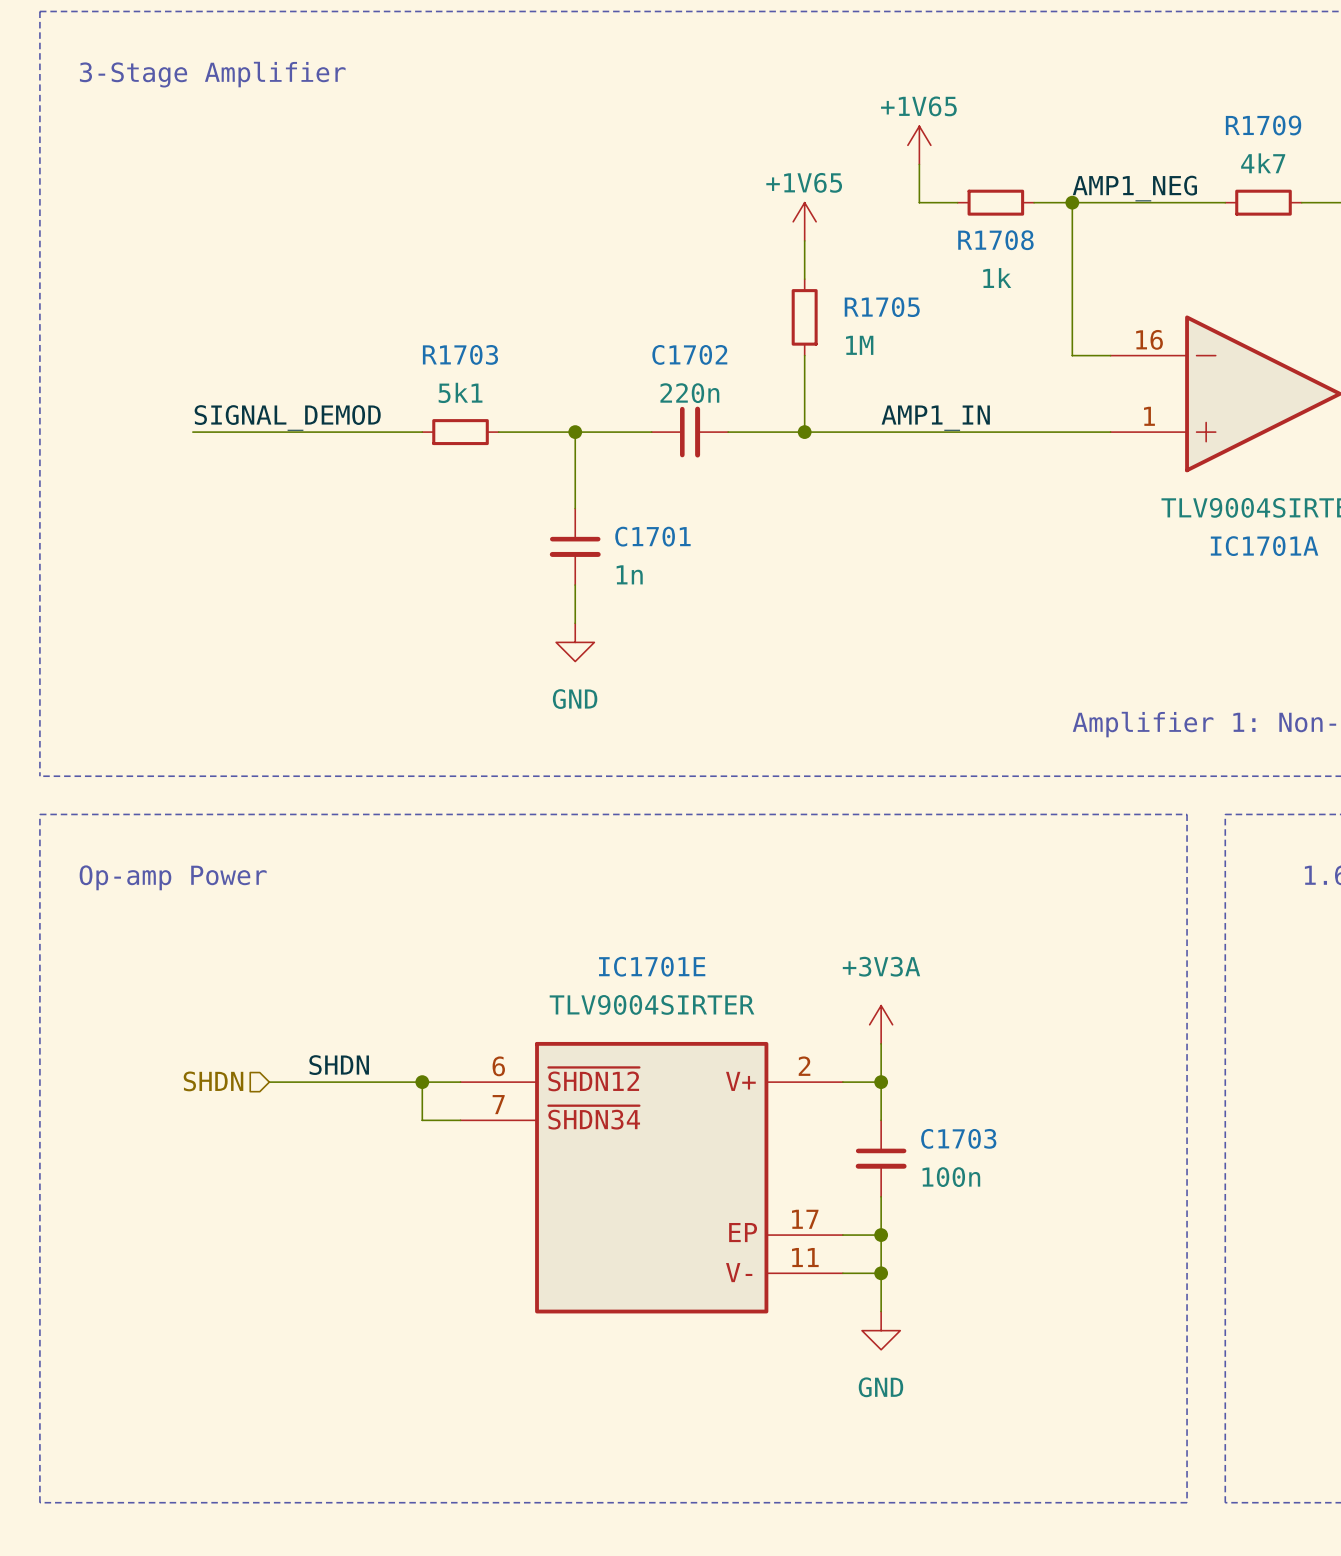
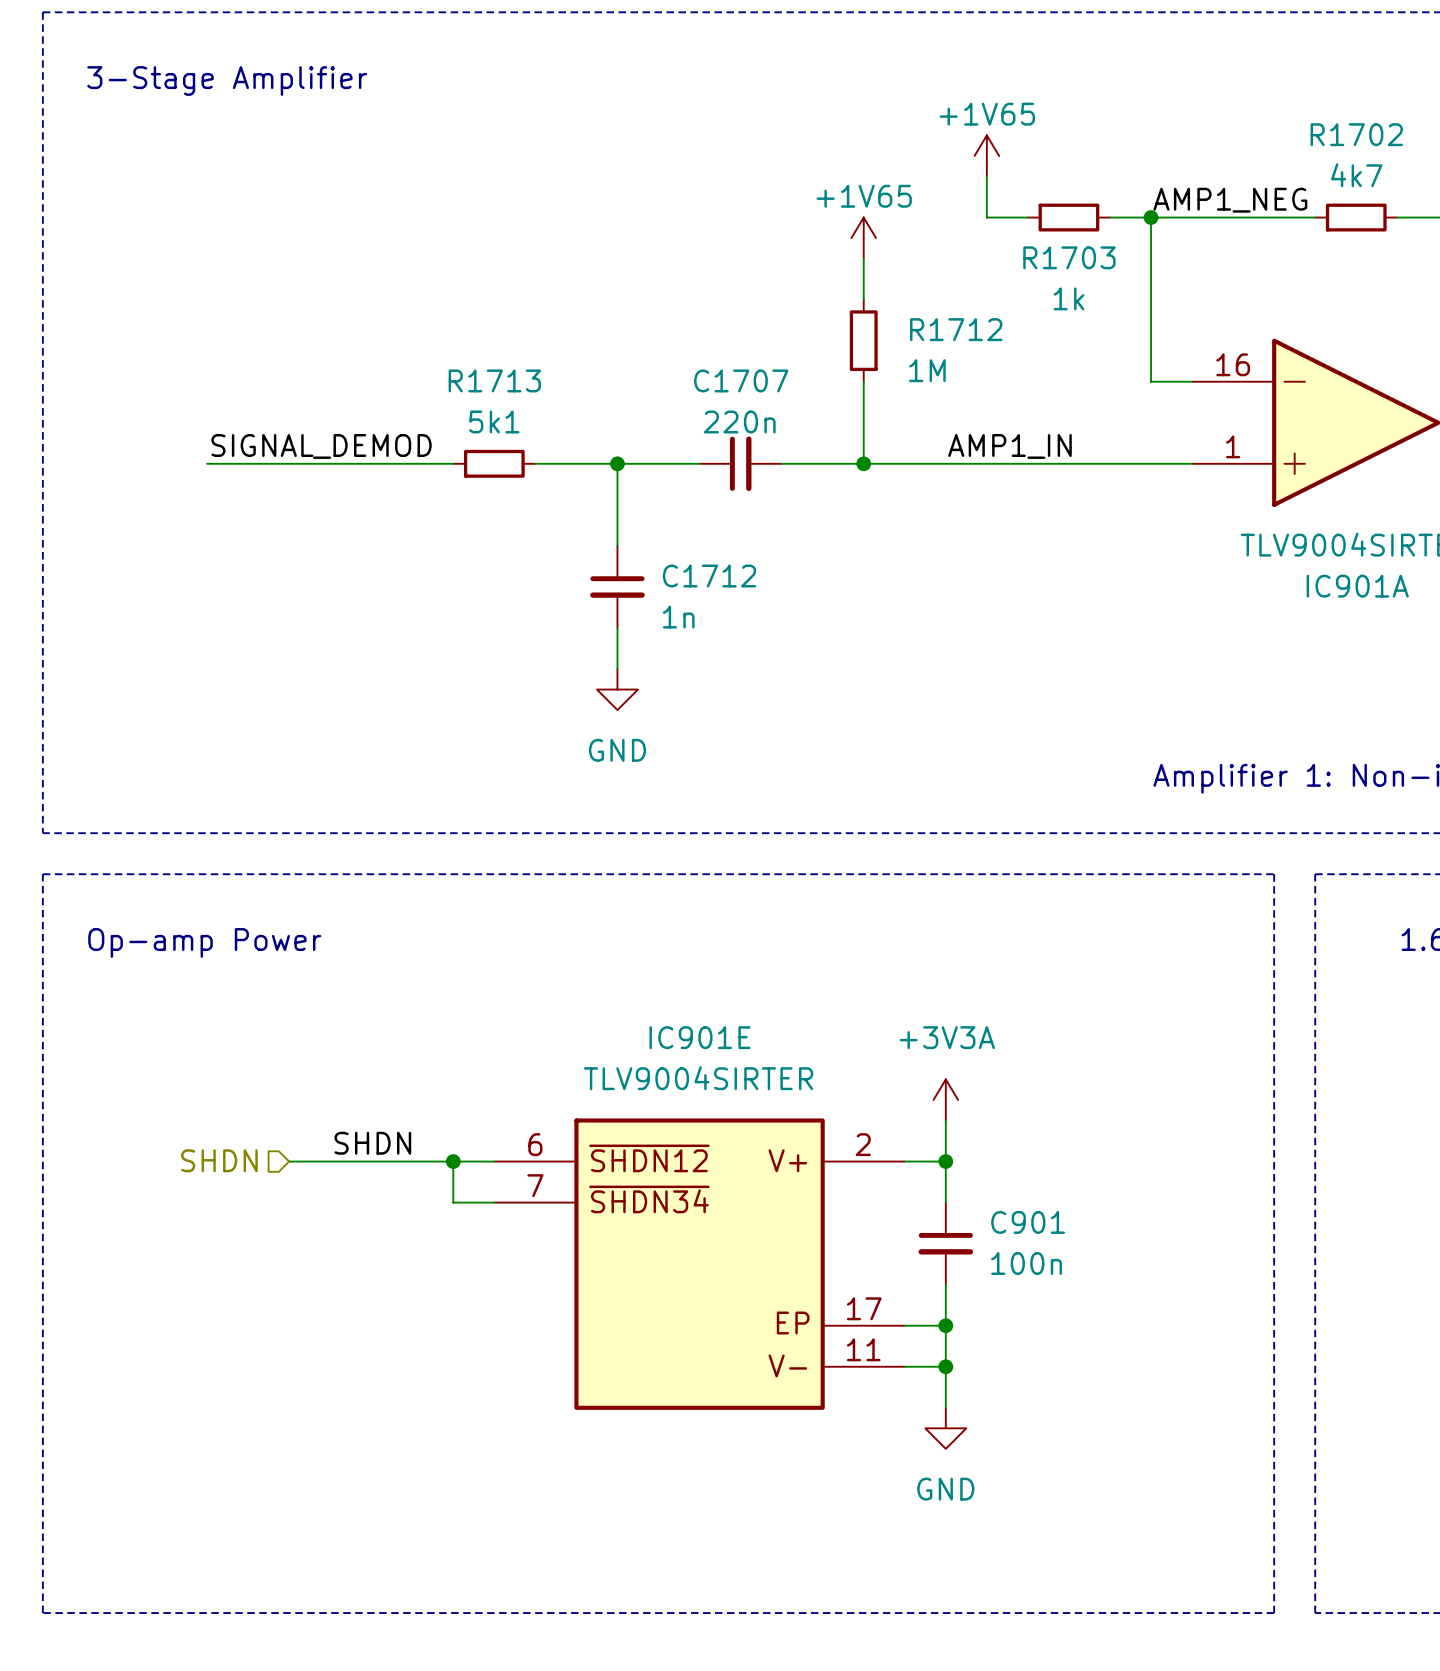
R1709 name: R1709 (1263, 125) -> R1702 (1356, 134)
R1708 name: R1708 (995, 240) -> R1703 (1069, 257)
R1705 name: R1705 (882, 307) -> R1712 (956, 329)
R1703 name: R1703 (460, 354) -> R1713 (494, 380)
C1702 name: C1702 (689, 354) -> C1707 (741, 380)
C1701 name: C1701 (652, 536) -> C1712 (709, 576)
IC1701A name: IC1701A (1264, 546) -> IC901A (1357, 586)
IC1701E name: IC1701E (652, 966) -> IC901E (700, 1037)
C1703 name: C1703 (958, 1138) -> C901 (1028, 1222)

